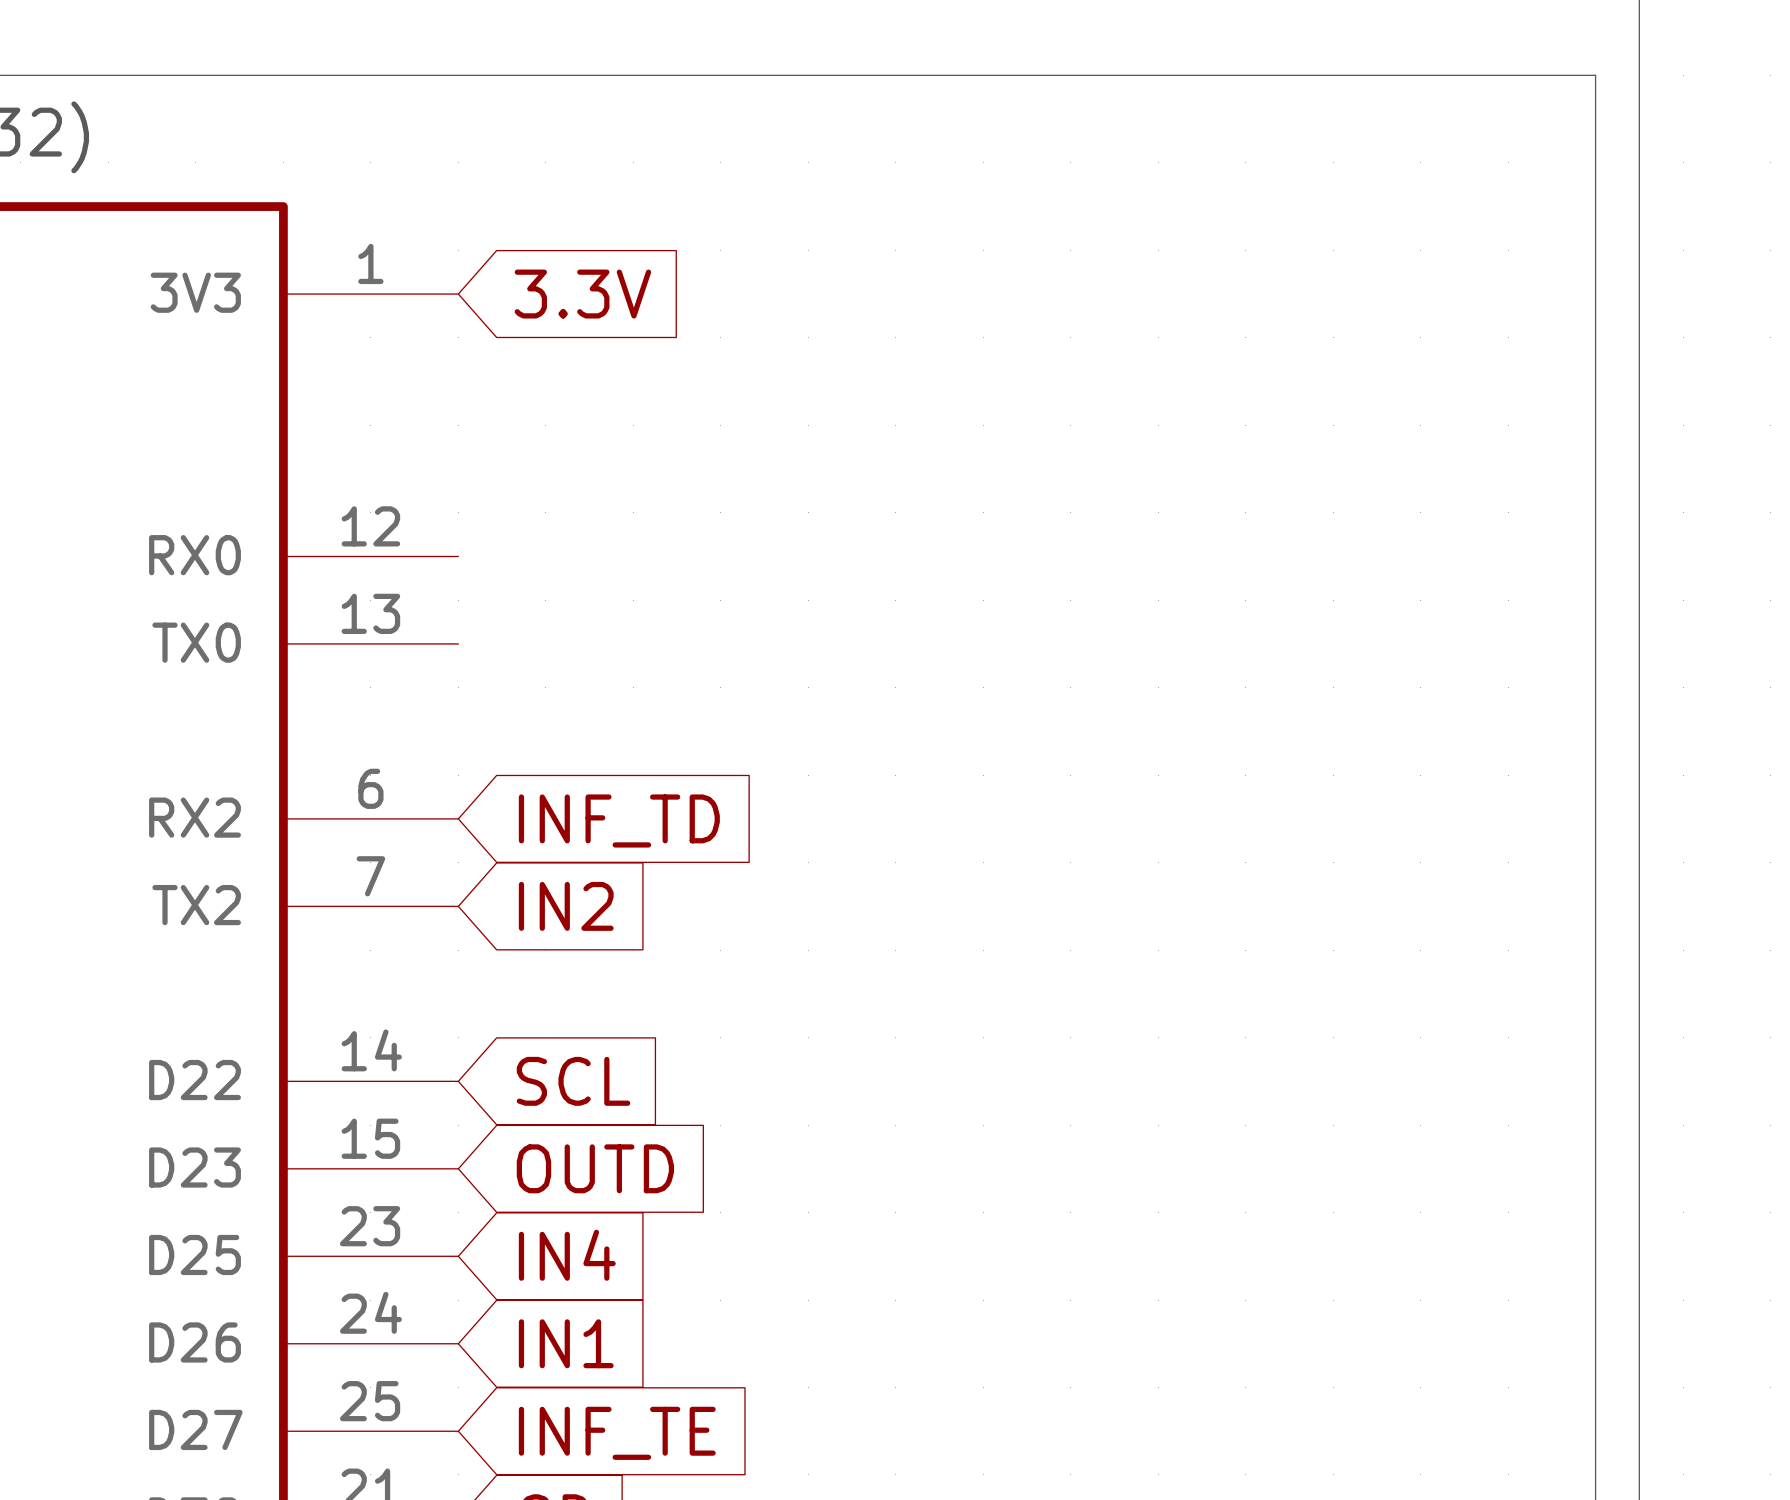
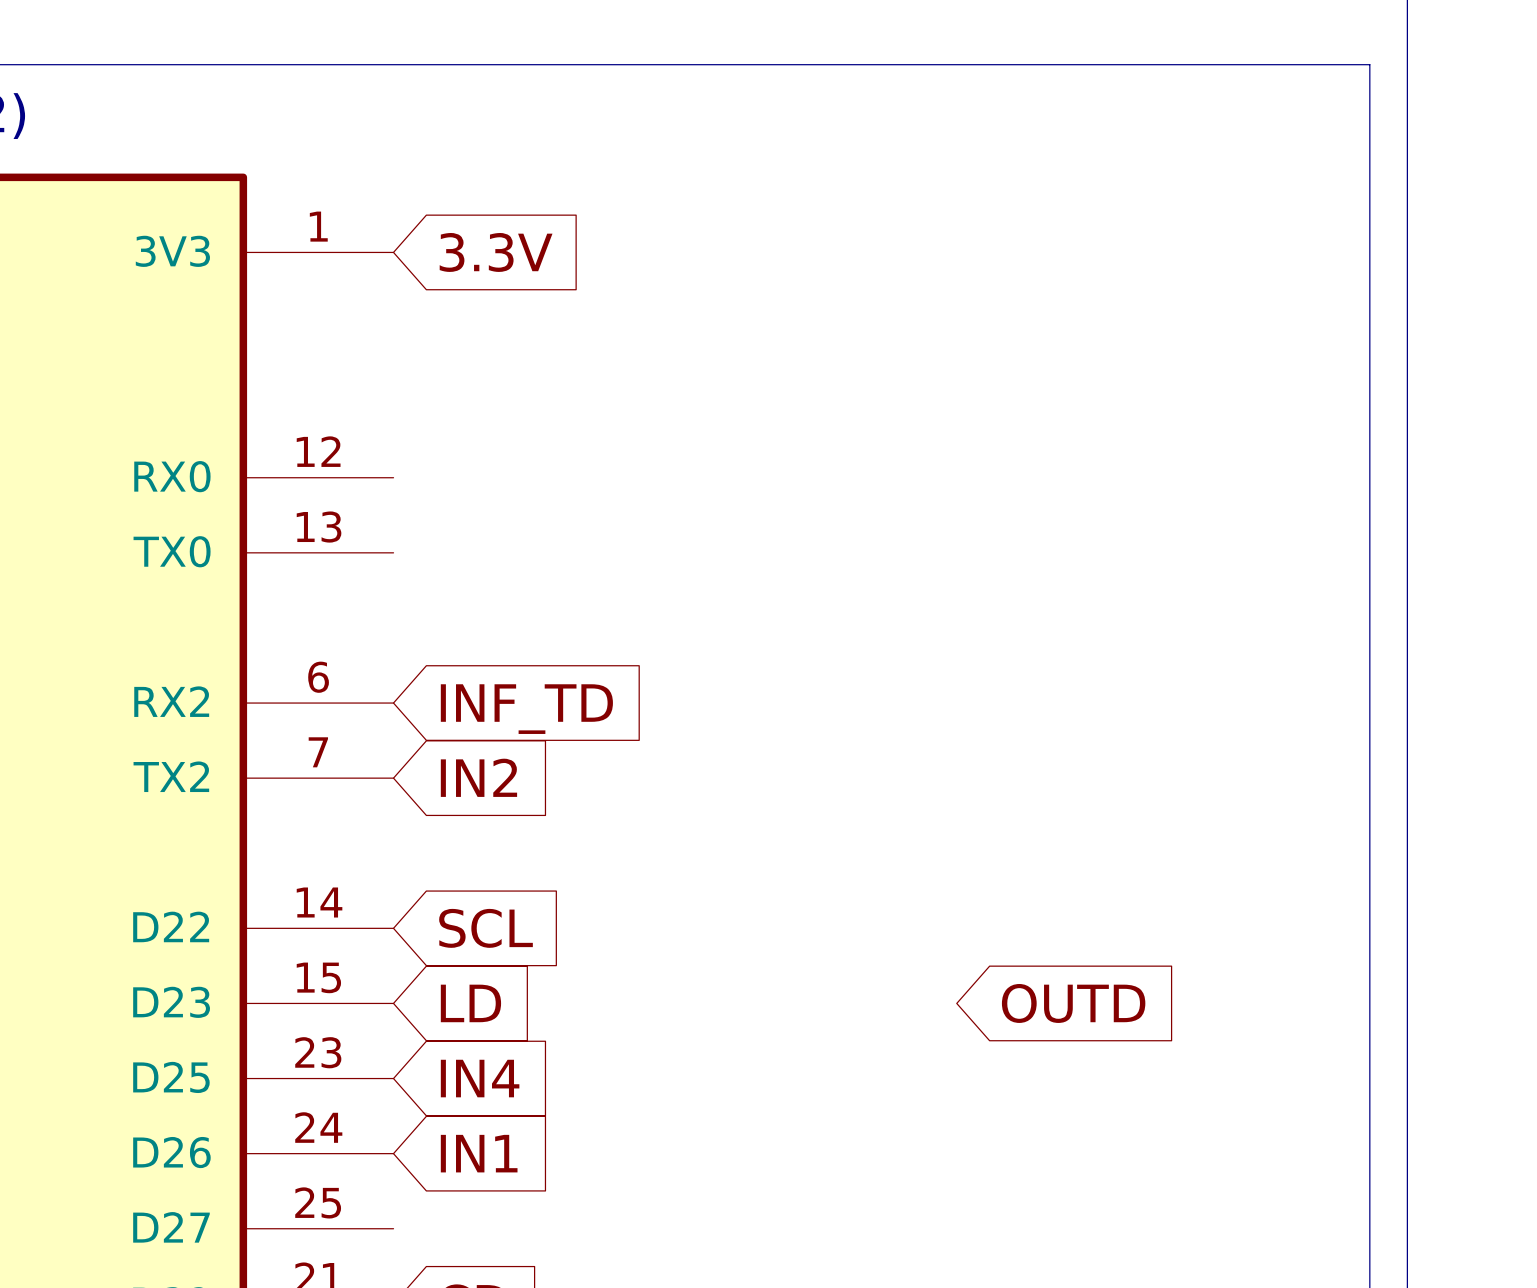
global label: OUTD (595, 1168) -> LD (470, 1003)
global label: none -> OUTD (1073, 1003)
global label: INF_TE (617, 1433) -> none

